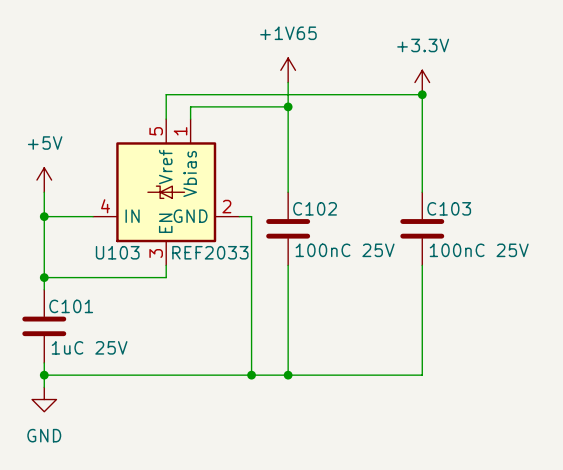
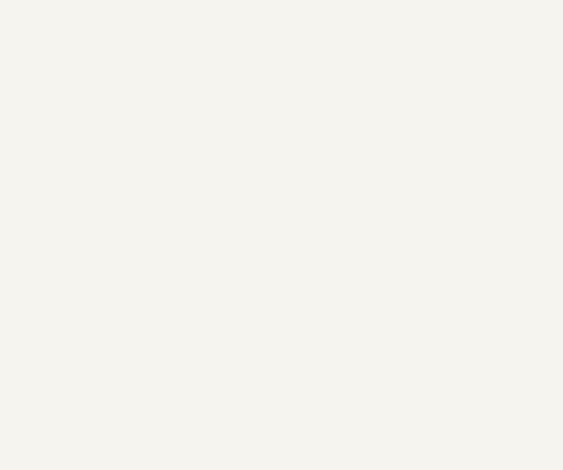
power symbol: +1V65 (288, 70) -> none
wire: (288, 82) (288, 192) -> none
power symbol: +3.3V (422, 82) -> none
junction: (422, 94) -> none
wire: (288, 106) (190, 106) (190, 119) -> none
junction: (288, 106) -> none
wire: (166, 119) (166, 94) (422, 94) (422, 192) -> none
power symbol: +5V (44, 180) -> none
wire: (44, 192) (44, 289) -> none
U103: REF2033 (166, 192) -> none
wire: (44, 216) (93, 216) -> none
junction: (44, 216) -> none
wire: (239, 216) (251, 216) (251, 375) -> none
C102: 100nC 25V (288, 228) -> none
C103: 100nC 25V (422, 228) -> none
wire: (166, 265) (166, 277) (44, 277) -> none
wire: (288, 265) (288, 375) -> none
wire: (422, 265) (422, 375) (44, 375) -> none
junction: (44, 277) -> none
C101: 1uC 25V (44, 326) -> none
wire: (44, 362) (44, 387) -> none
junction: (44, 375) -> none
junction: (251, 375) -> none
junction: (288, 375) -> none
power symbol: GND (44, 399) -> none

